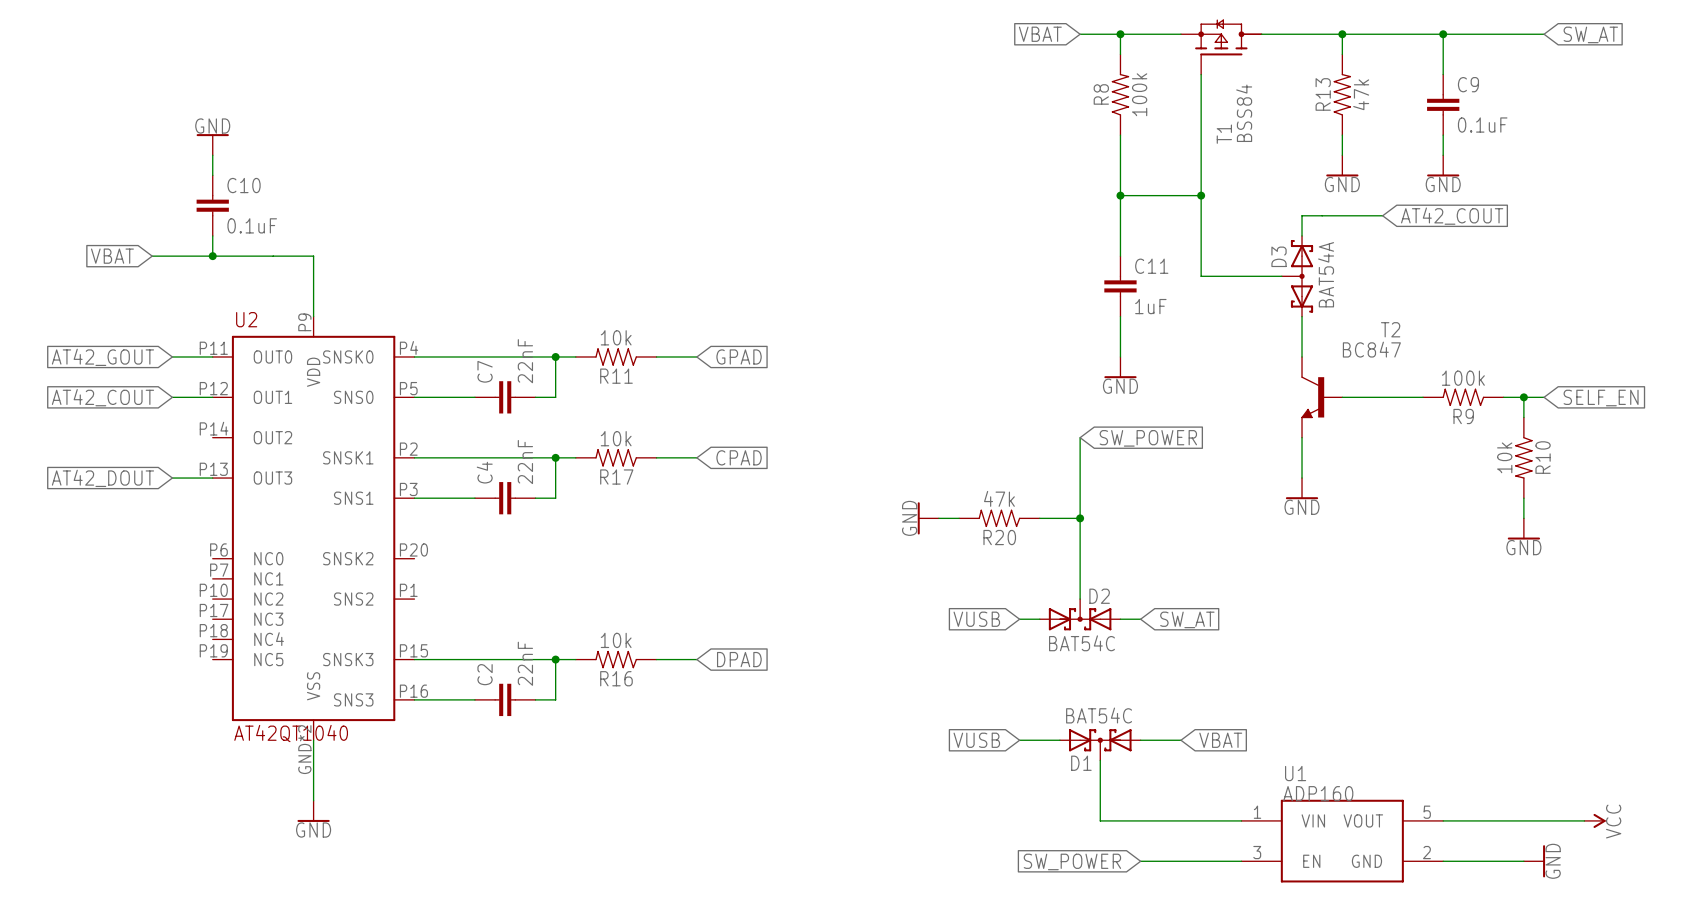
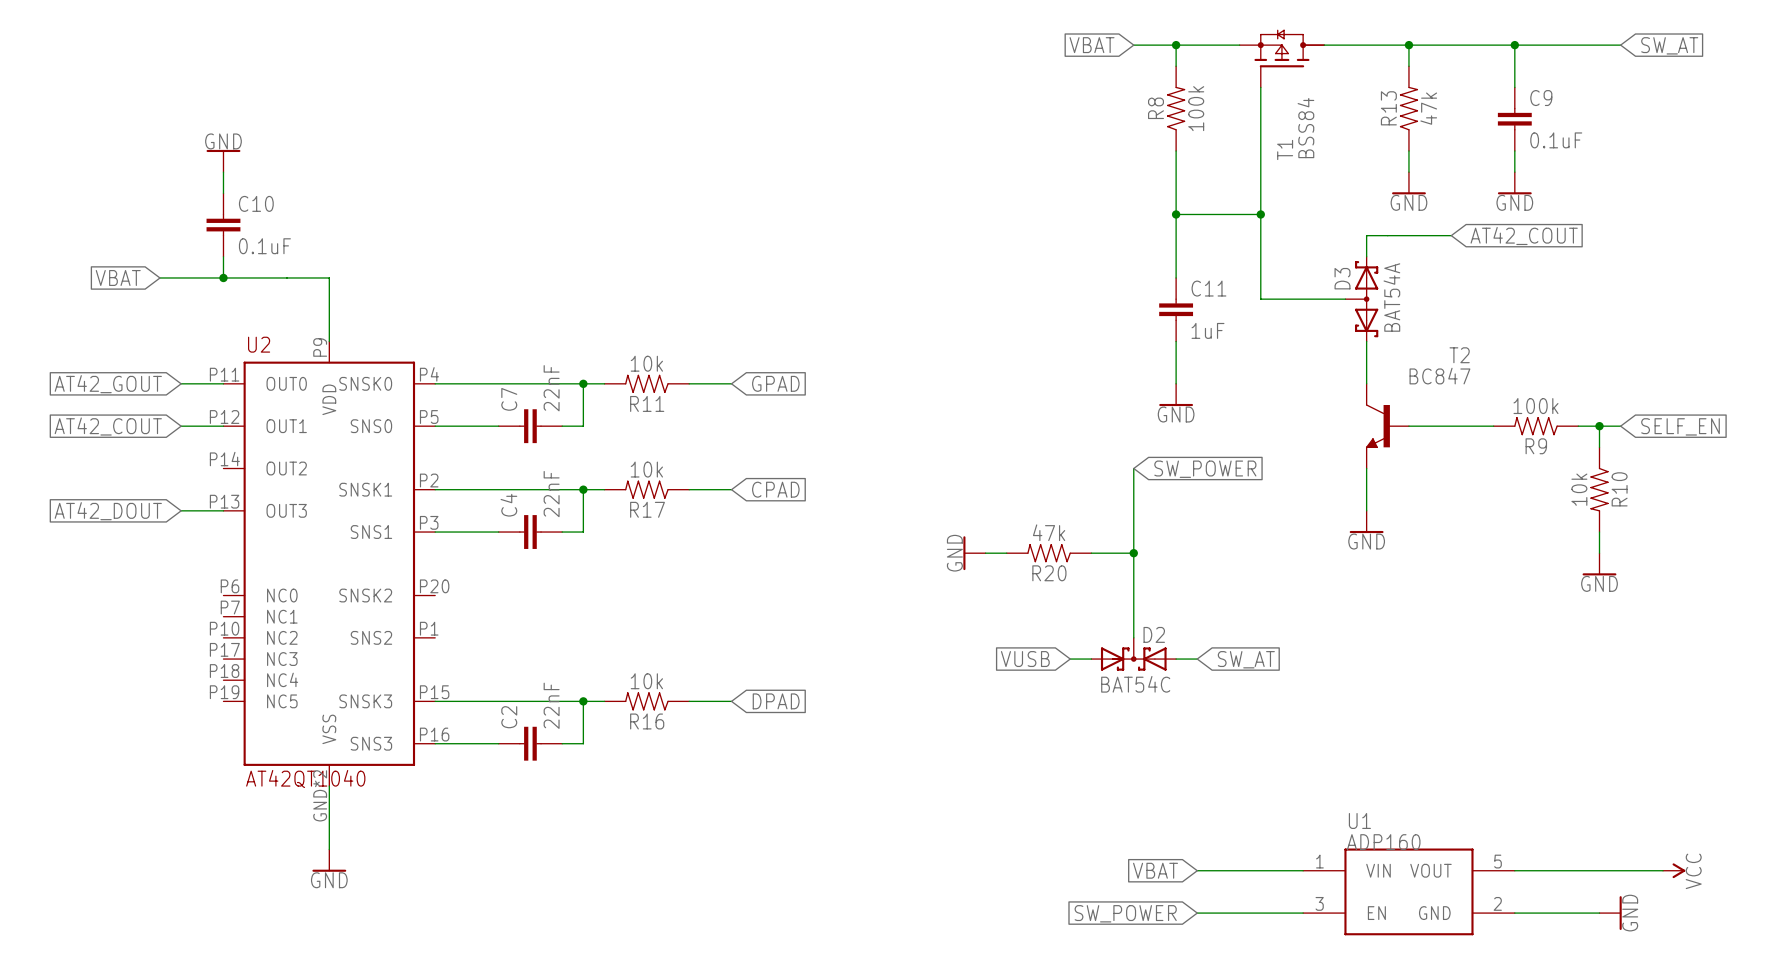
global label: VUSB (976, 740) -> none
wire: (1019, 740) (1059, 740) -> none
wire: (1140, 740) (1180, 740) -> none
global label rotation: 0° (1220, 740) -> 180° (1155, 870)
global label position: VBAT (1220, 740) -> VBAT (1155, 870)
D1: BAT54C (1100, 744) -> none
wire: (1100, 760) (1100, 820) (1140, 820) -> none

